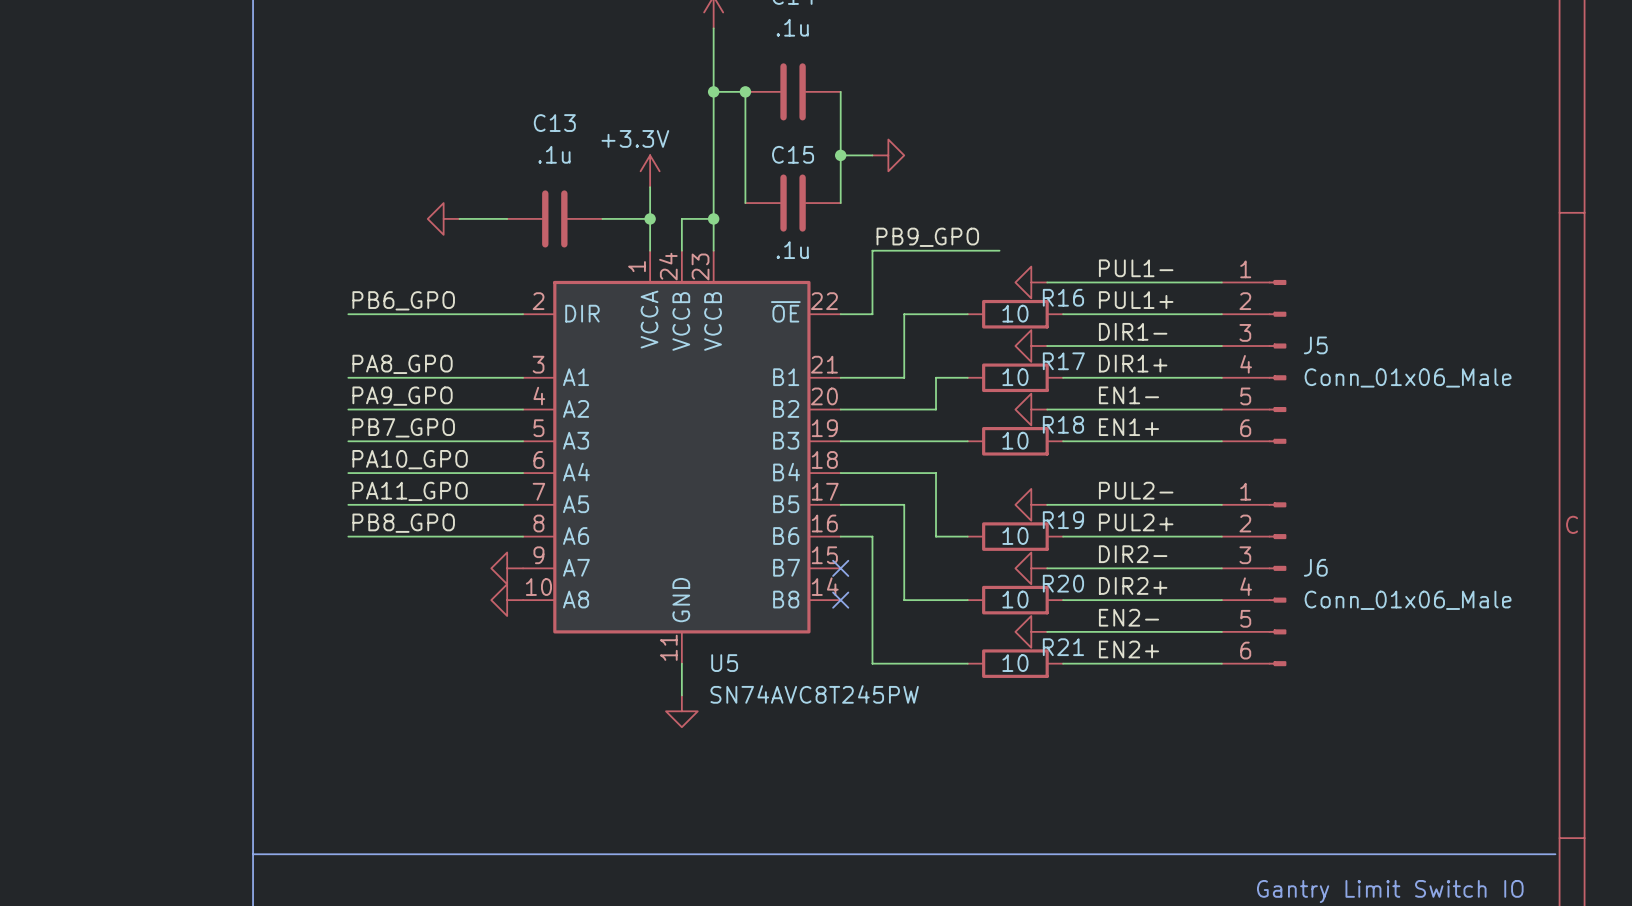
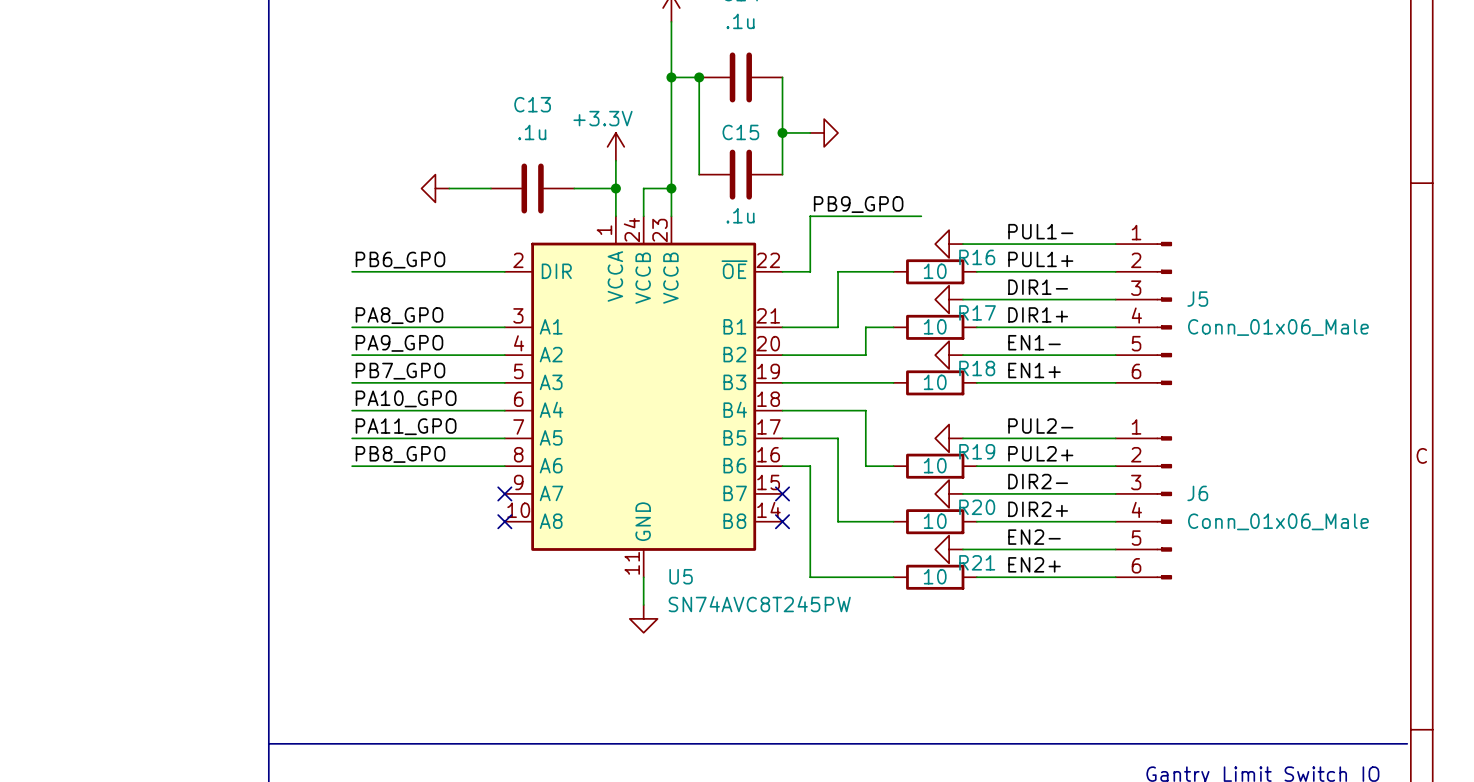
power symbol: (507, 568) -> none
no-connect mark: none -> (504, 493)
power symbol: (507, 600) -> none
no-connect mark: none -> (504, 521)

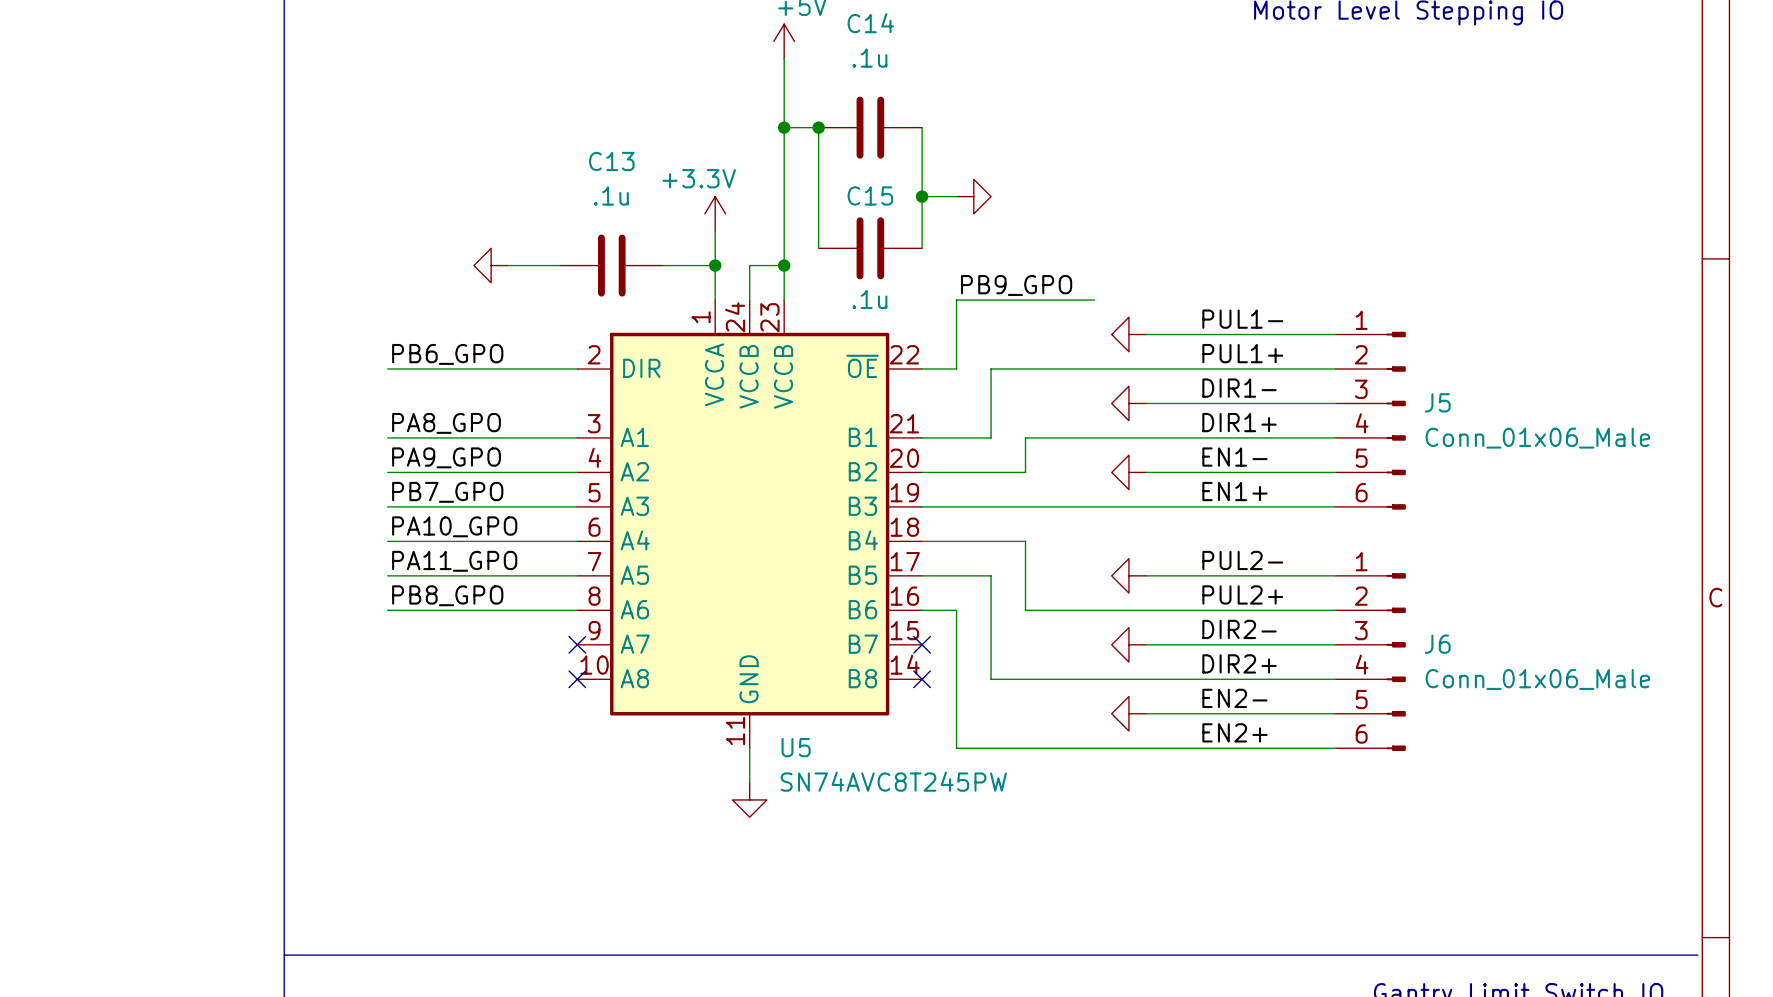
wire: none -> (1059, 369) (1163, 369)
R16: 10 (935, 271) -> none
wire: none -> (1059, 437) (1163, 437)
R17: 10 (935, 327) -> none
wire: none -> (1059, 506) (1163, 506)
R18: 10 (935, 382) -> none
wire: none -> (1059, 610) (1163, 610)
R19: 10 (935, 466) -> none
wire: none -> (1059, 679) (1163, 679)
R20: 10 (935, 521) -> none
wire: none -> (1059, 748) (1163, 748)
R21: 10 (935, 577) -> none

